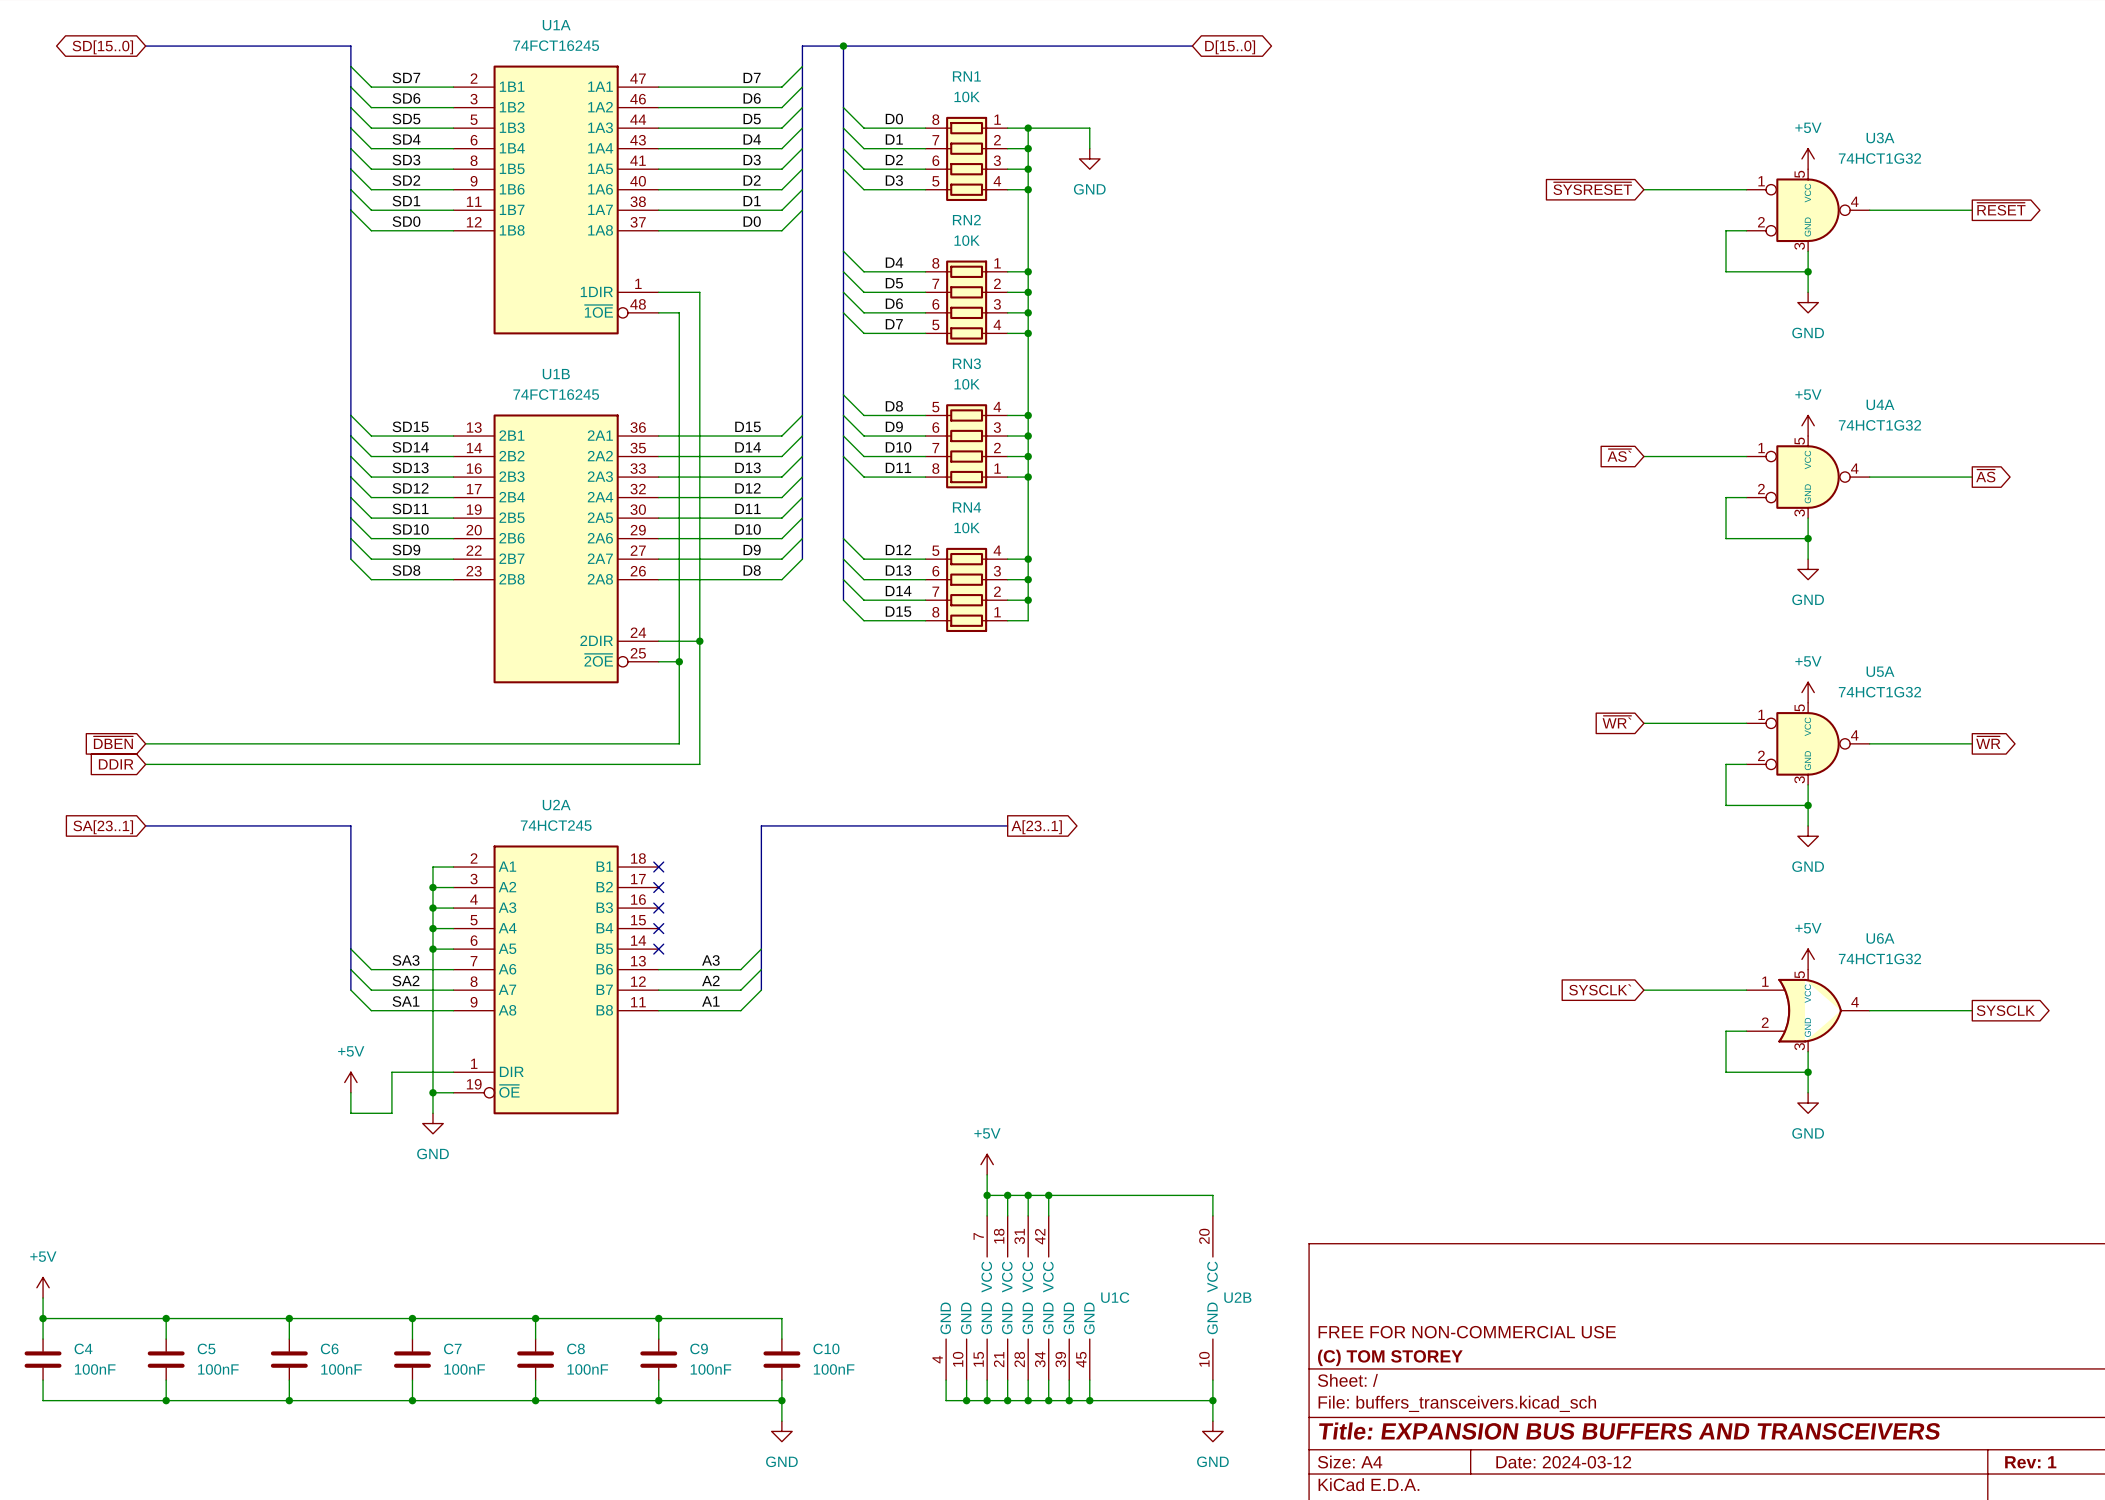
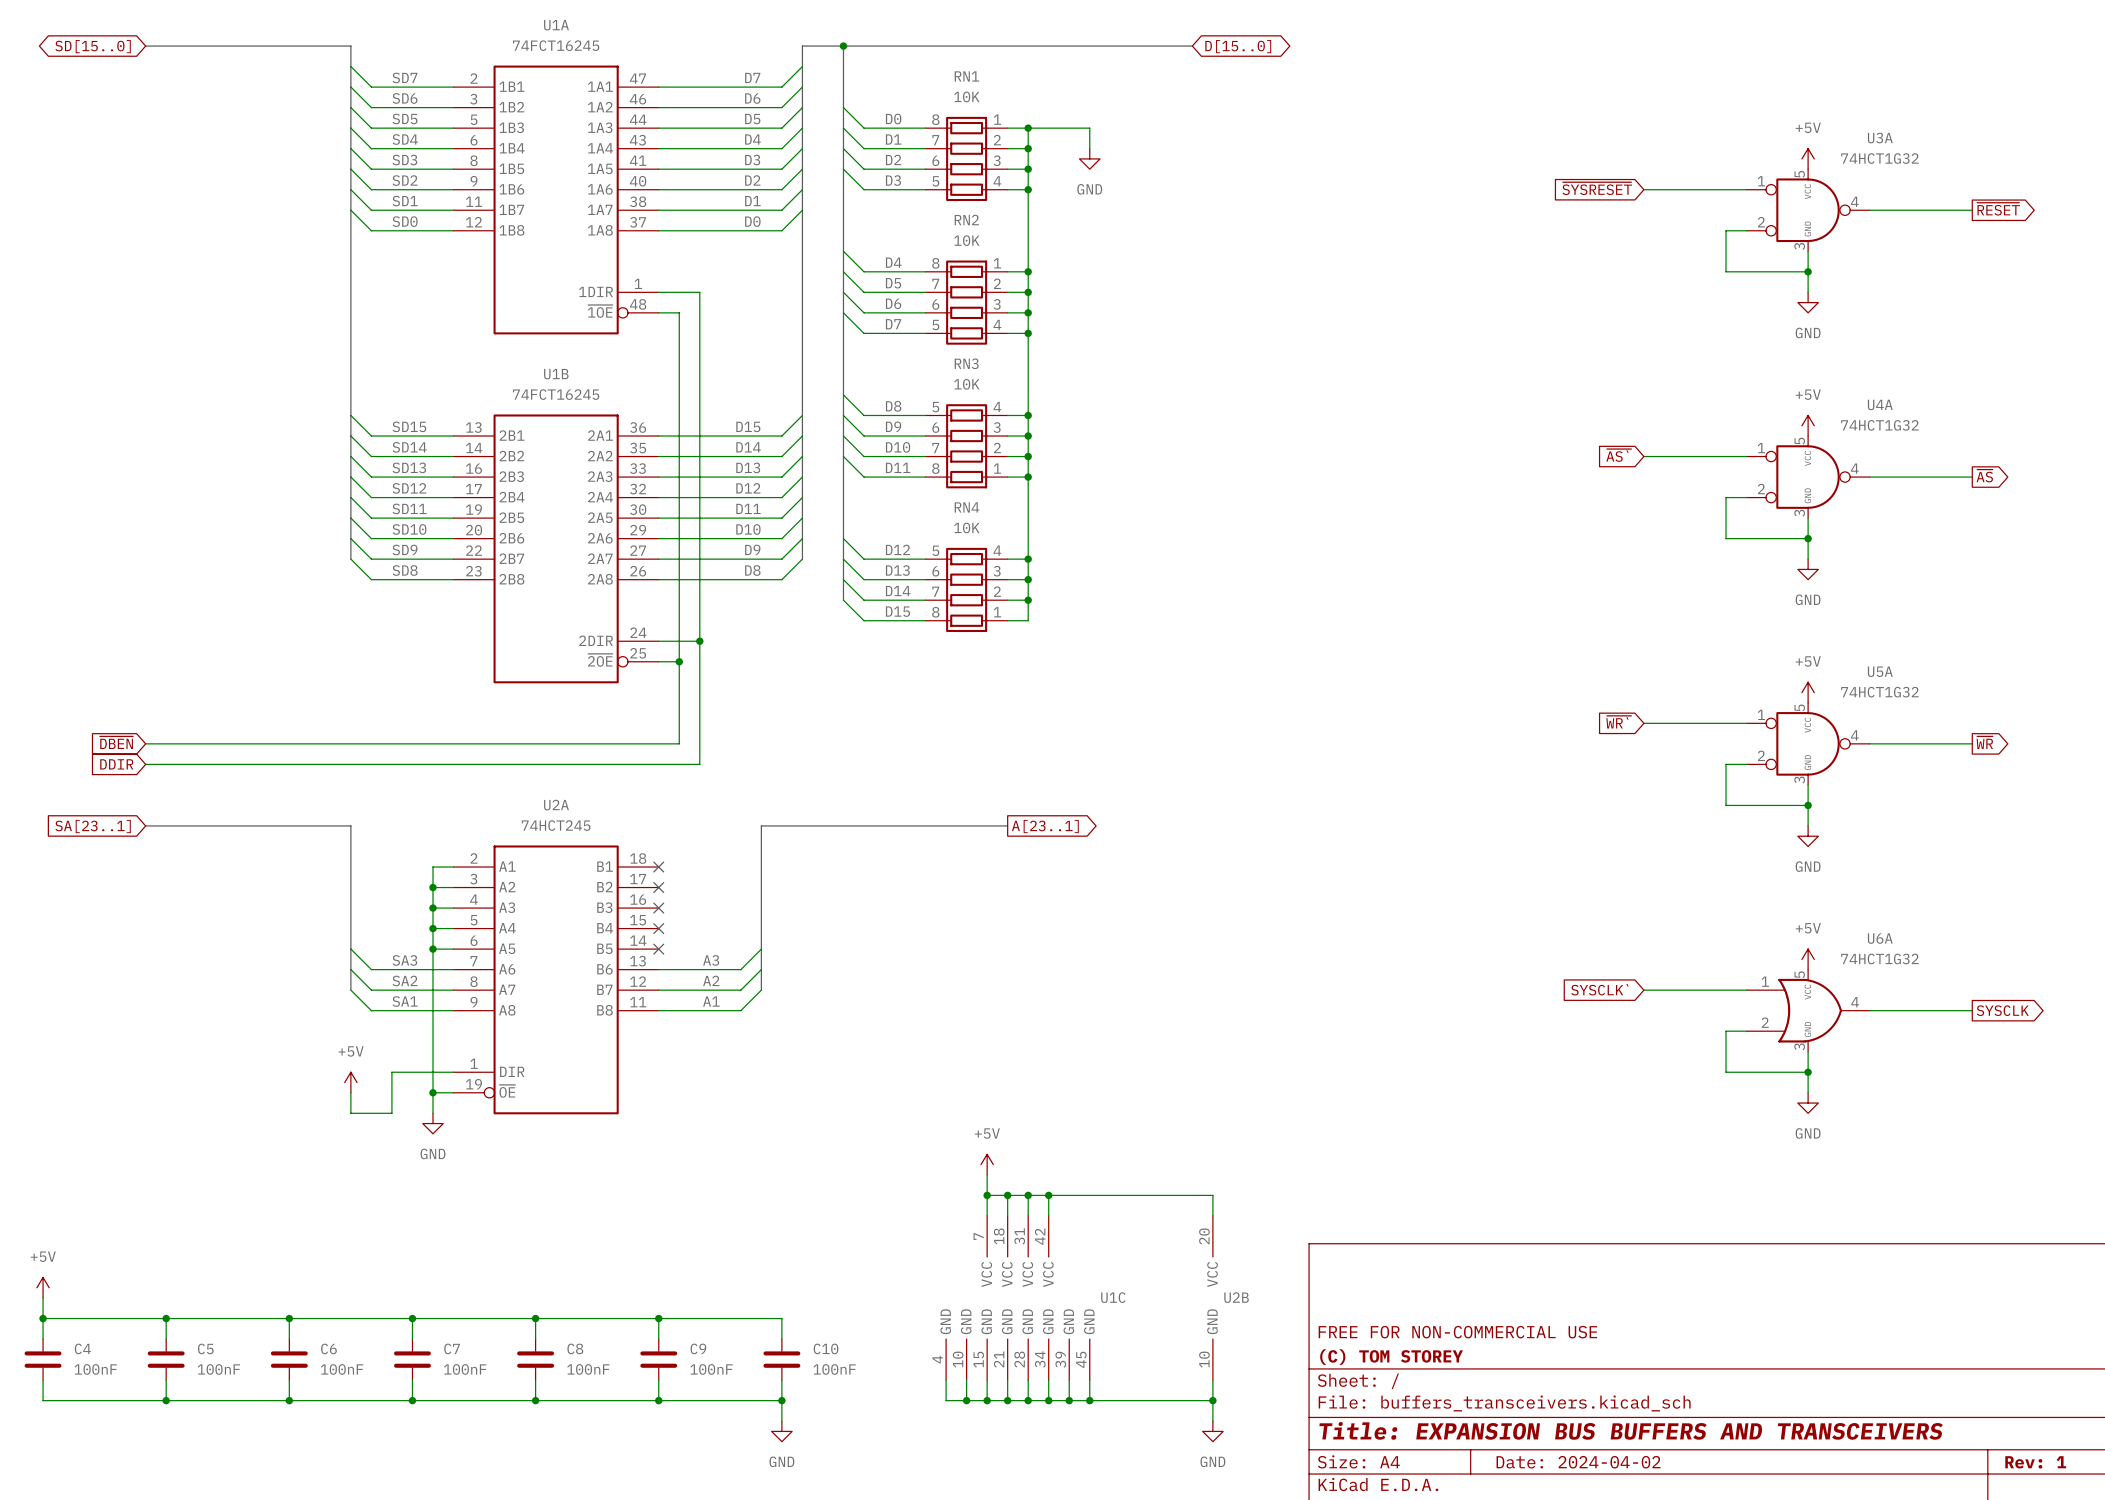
title block: Date: 2024-03-12 (1563, 1462) -> Date: 2024-04-02 (1578, 1462)

